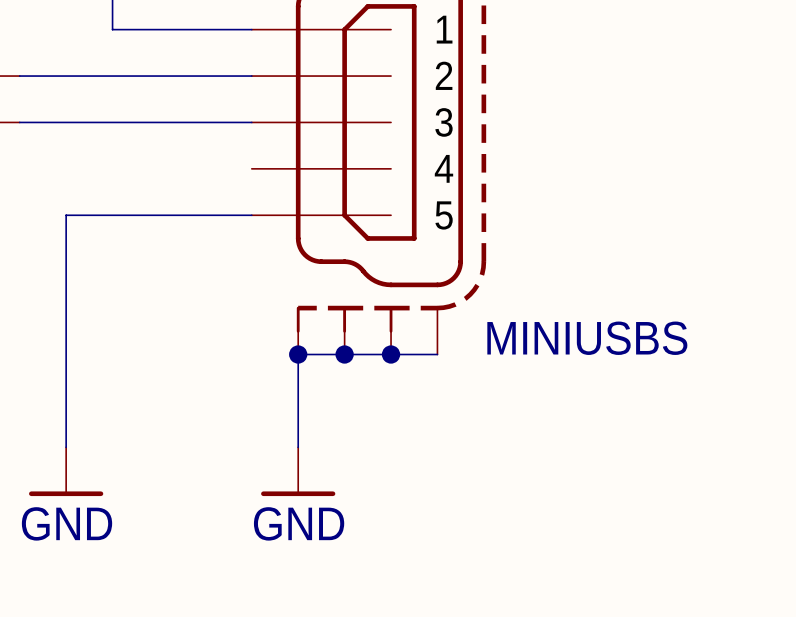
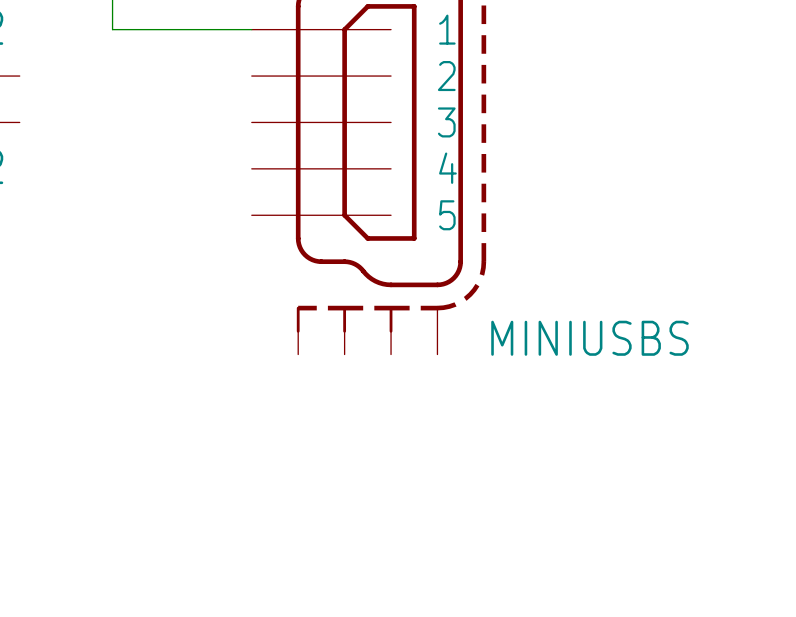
wire: (19, 76) (251, 76) -> none
wire: (19, 122) (251, 122) -> none
wire: (251, 215) (66, 215) (66, 447) -> none
junction: (298, 354) -> none
junction: (344, 354) -> none
junction: (391, 354) -> none
wire: (437, 354) (298, 354) (298, 447) -> none
power symbol: GND (66, 471) -> none
power symbol: GND (298, 471) -> none

